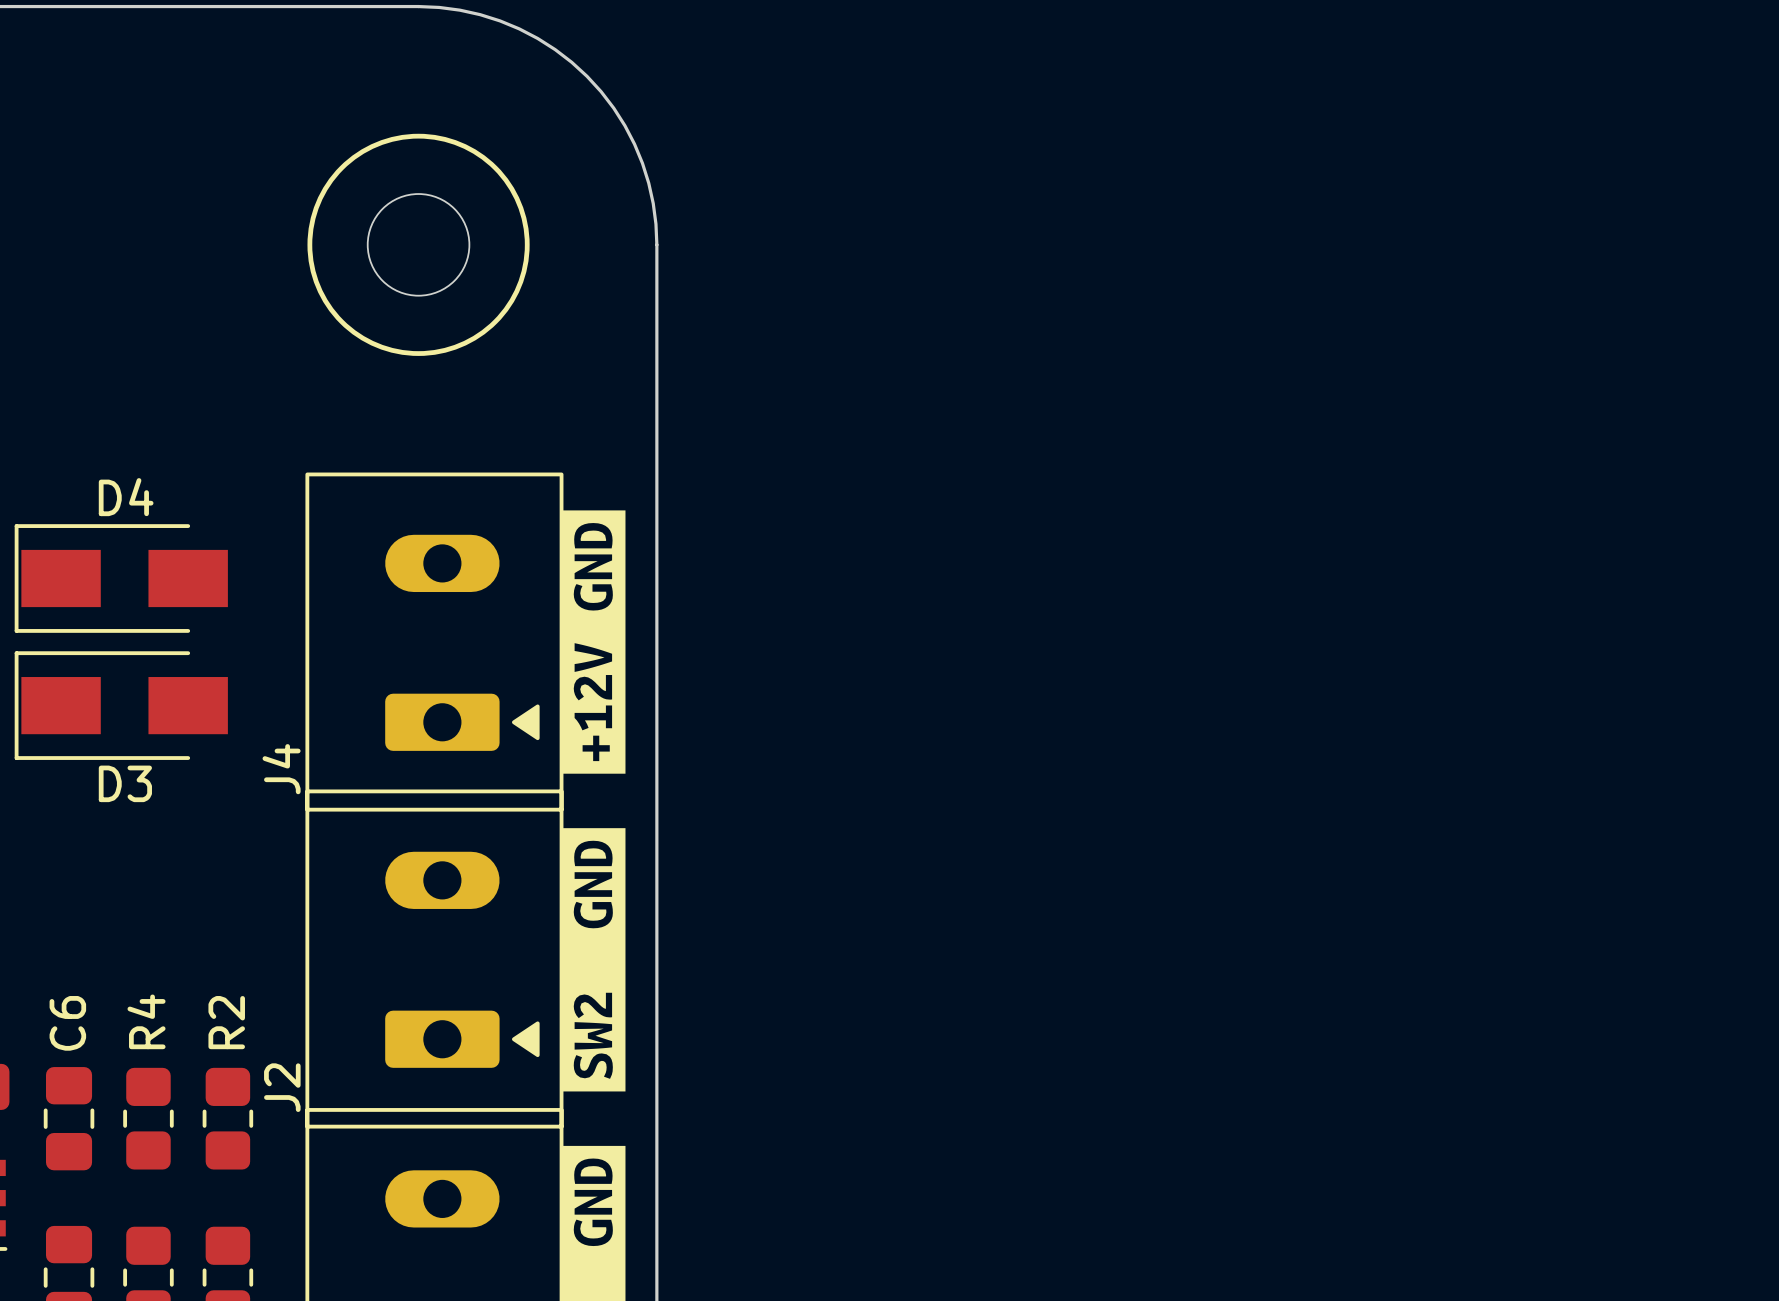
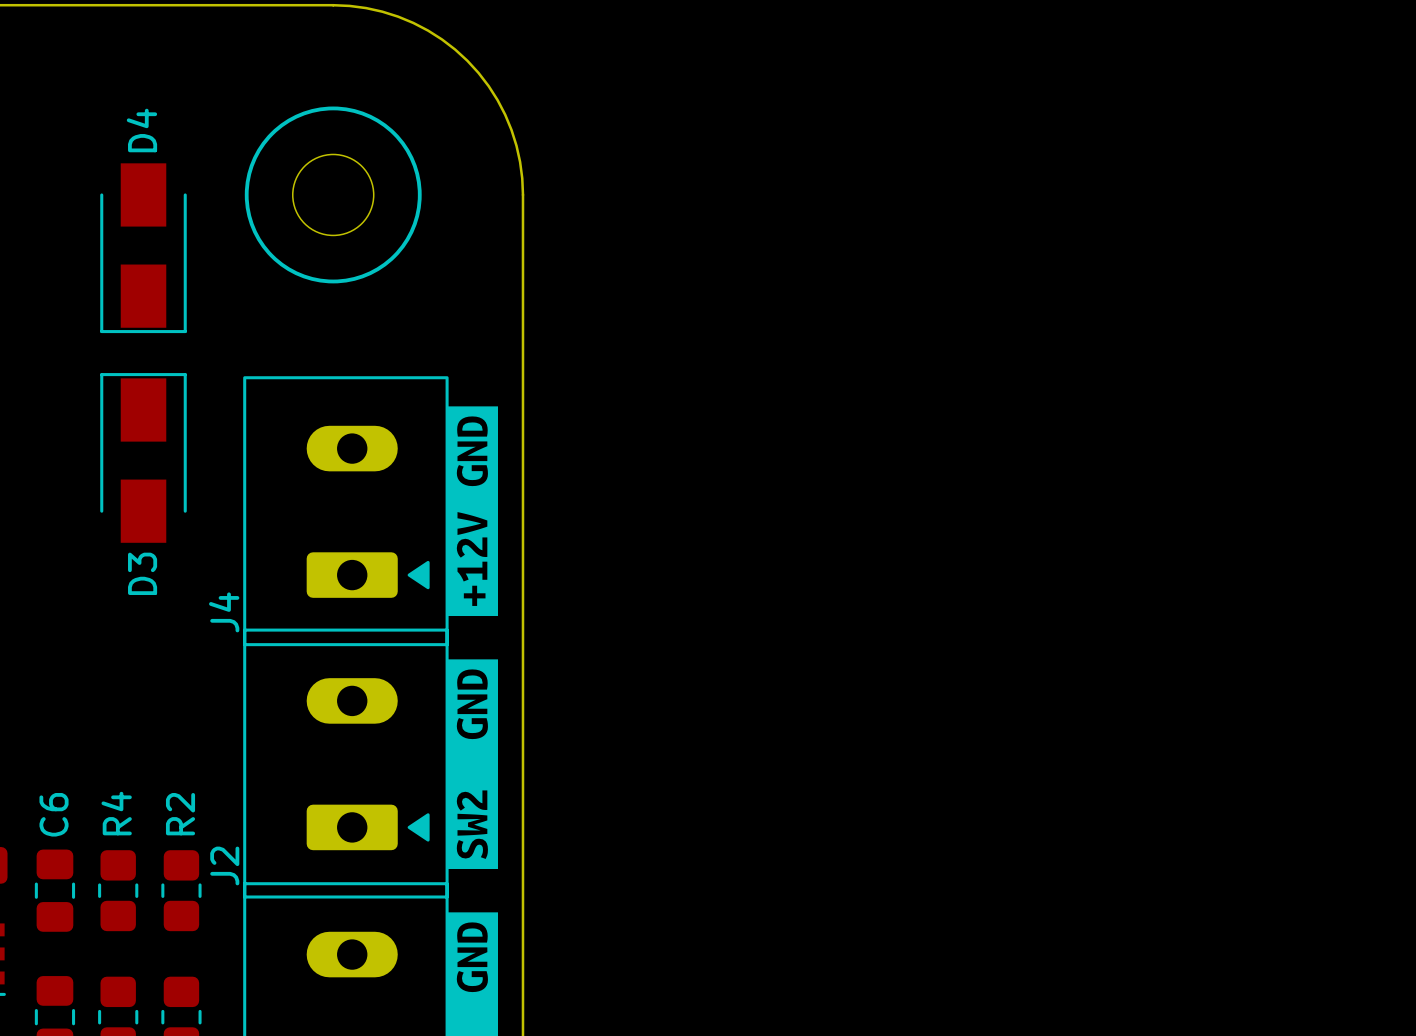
D4 name position: D4 (126, 497) -> D4 (141, 130)
D4 rotation: 0° (121, 578) -> 90° counterclockwise (143, 248)
D4 position: (121, 578) -> (143, 248)
D3 rotation: 0° (121, 705) -> 90° clockwise (143, 457)
D3 position: (121, 705) -> (143, 457)
D3 name position: D3 (125, 783) -> D3 (142, 573)

